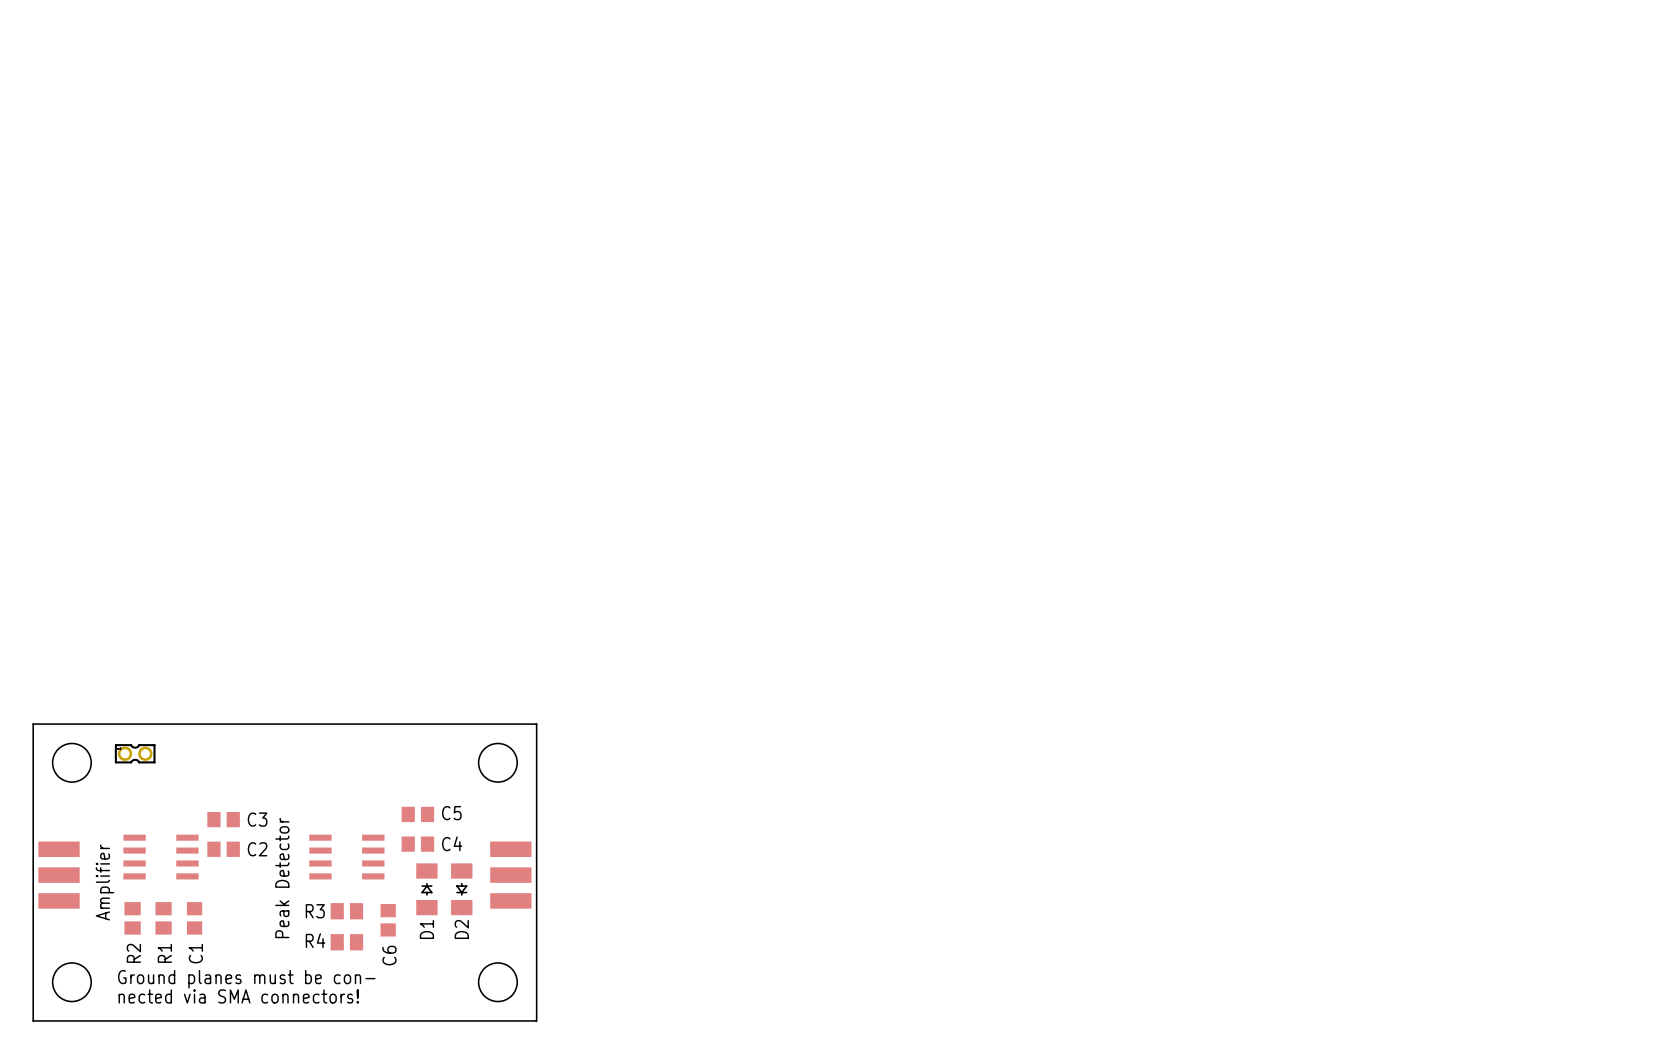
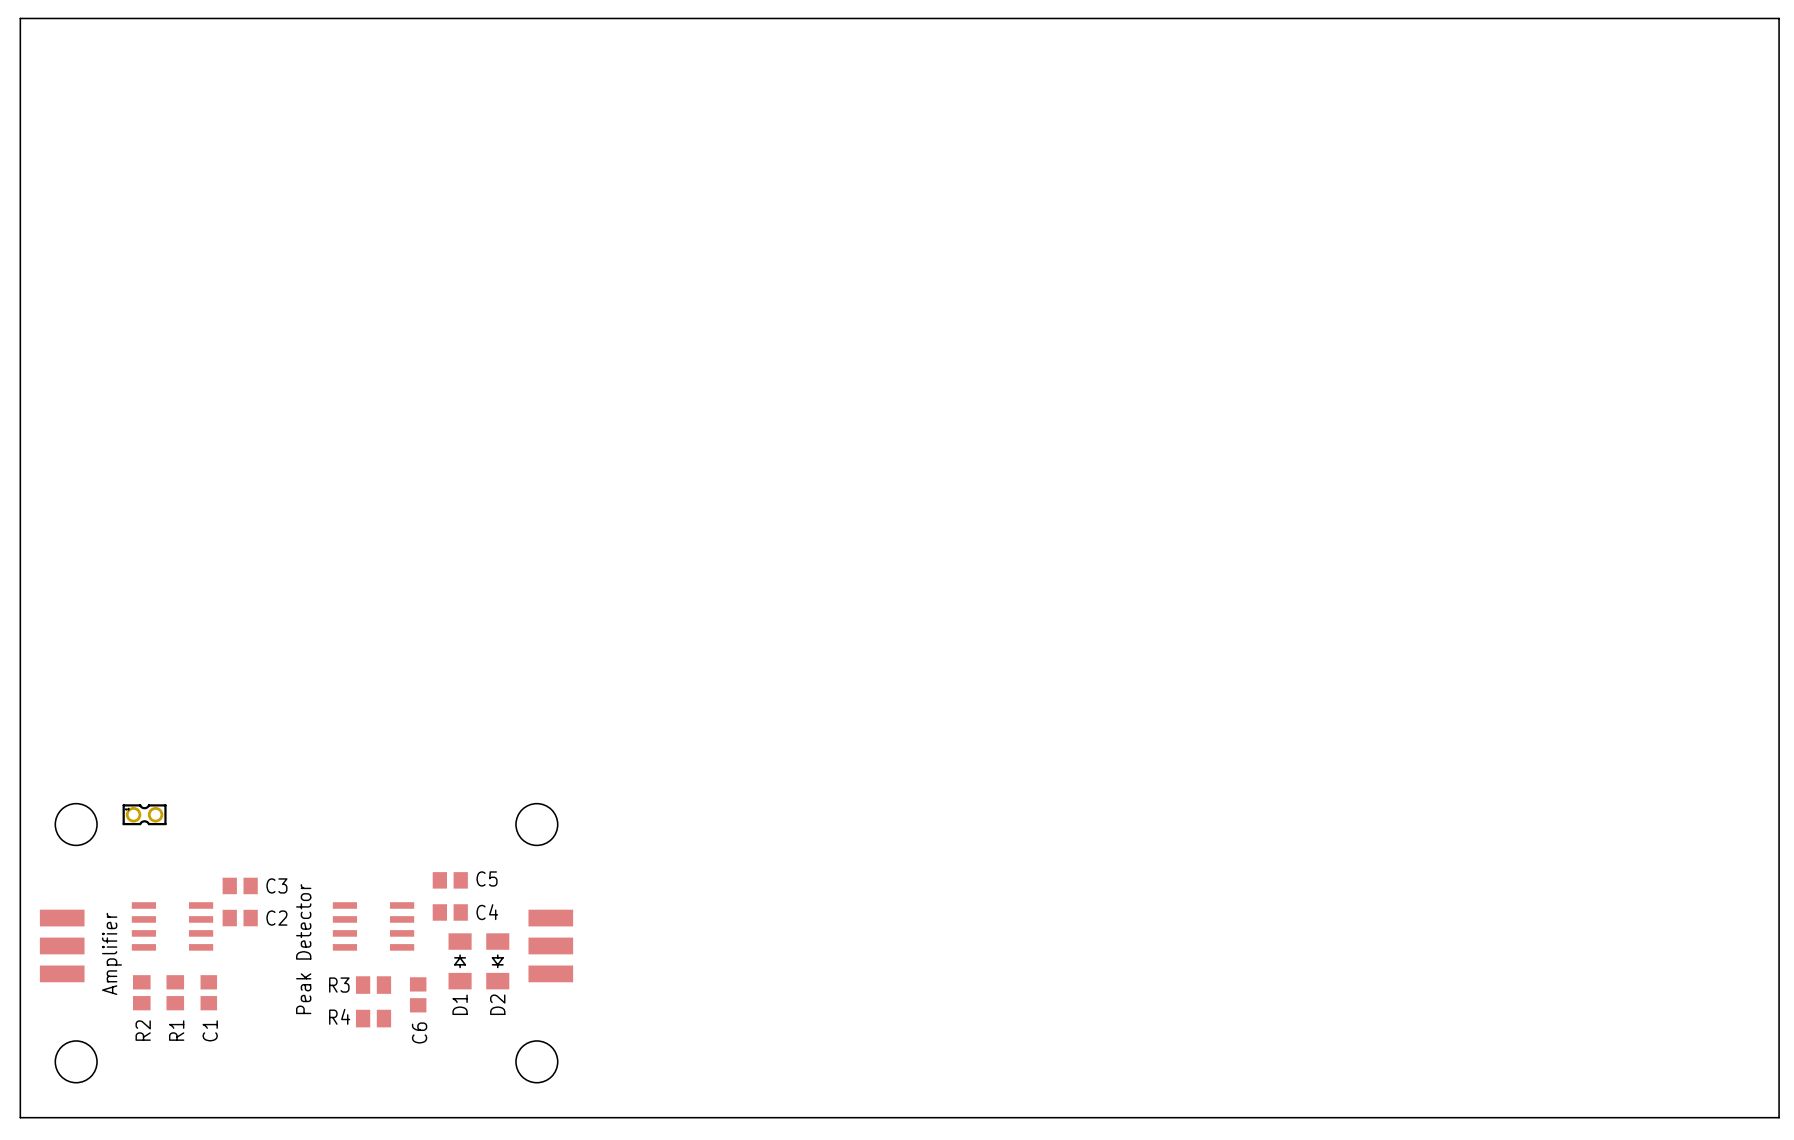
board edge: none -> (20, 18) (1779, 18) (1779, 1117) (20, 1117) (20, 18)
board edge: (33, 724) (33, 1020) (536, 1020) (536, 724) (33, 724) -> none
text: Ground planes must be con- (246, 979) -> none
text: nected via SMA connectors! (238, 996) -> none

